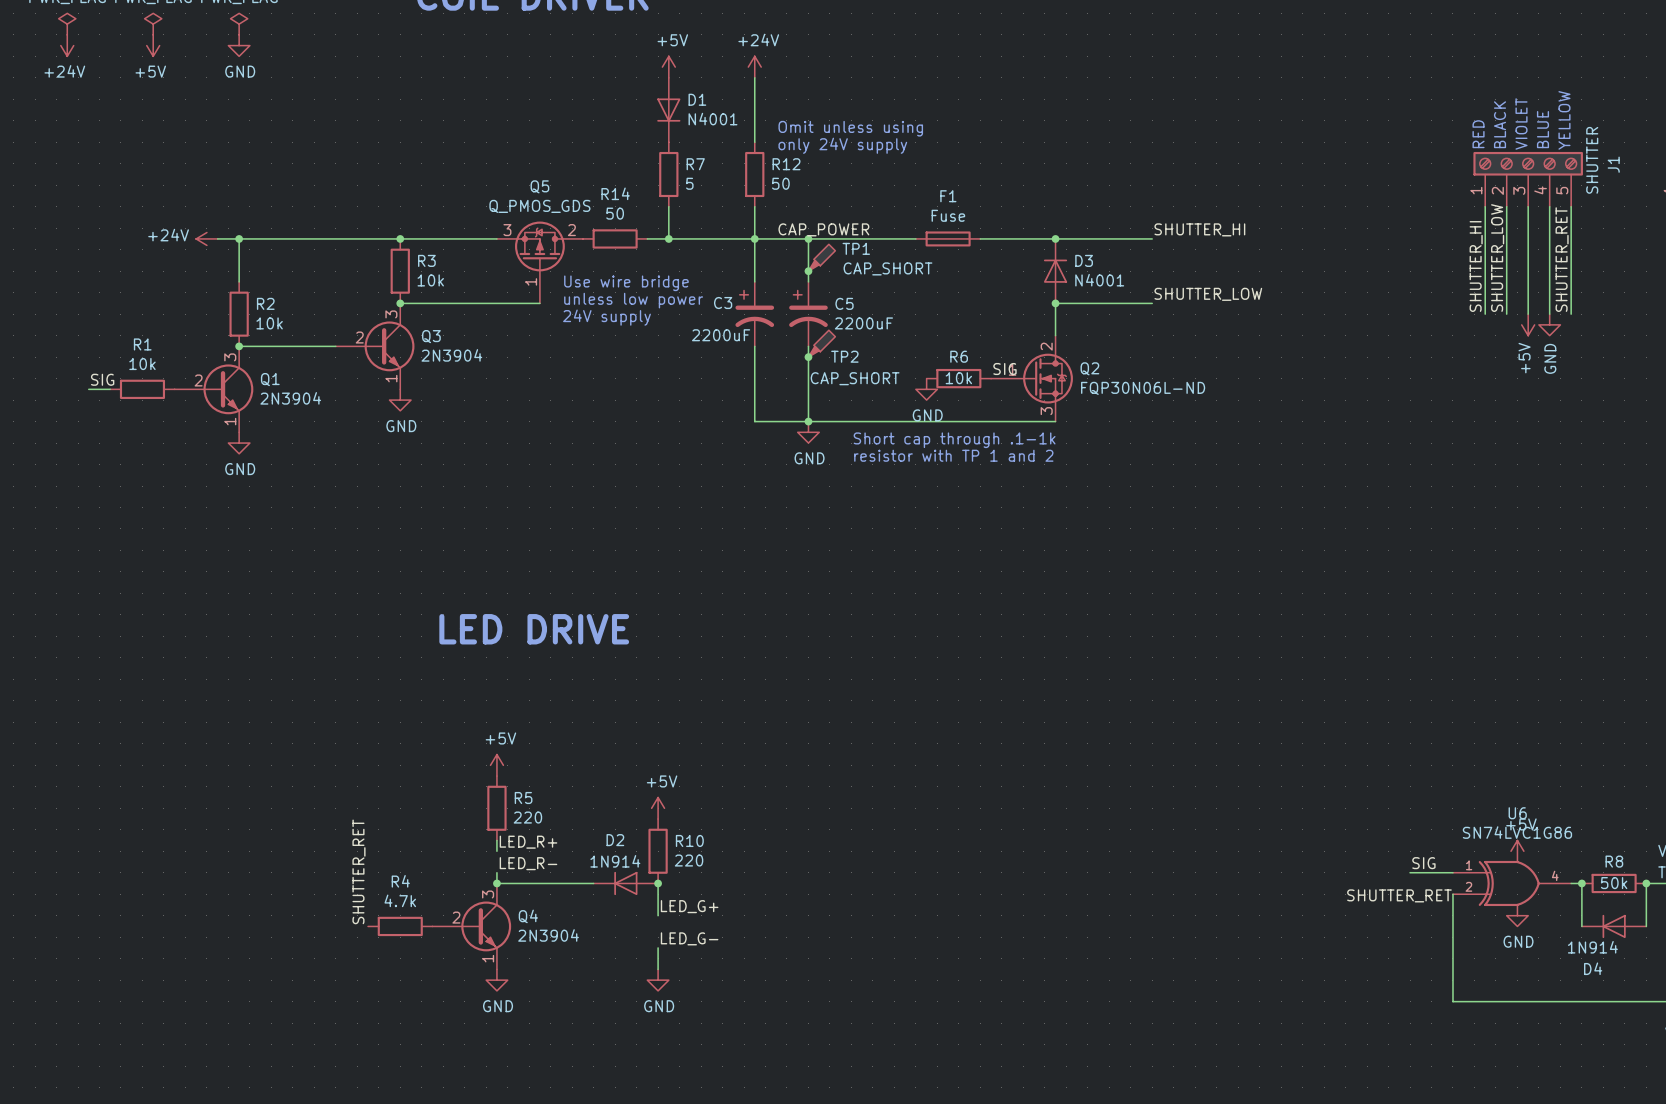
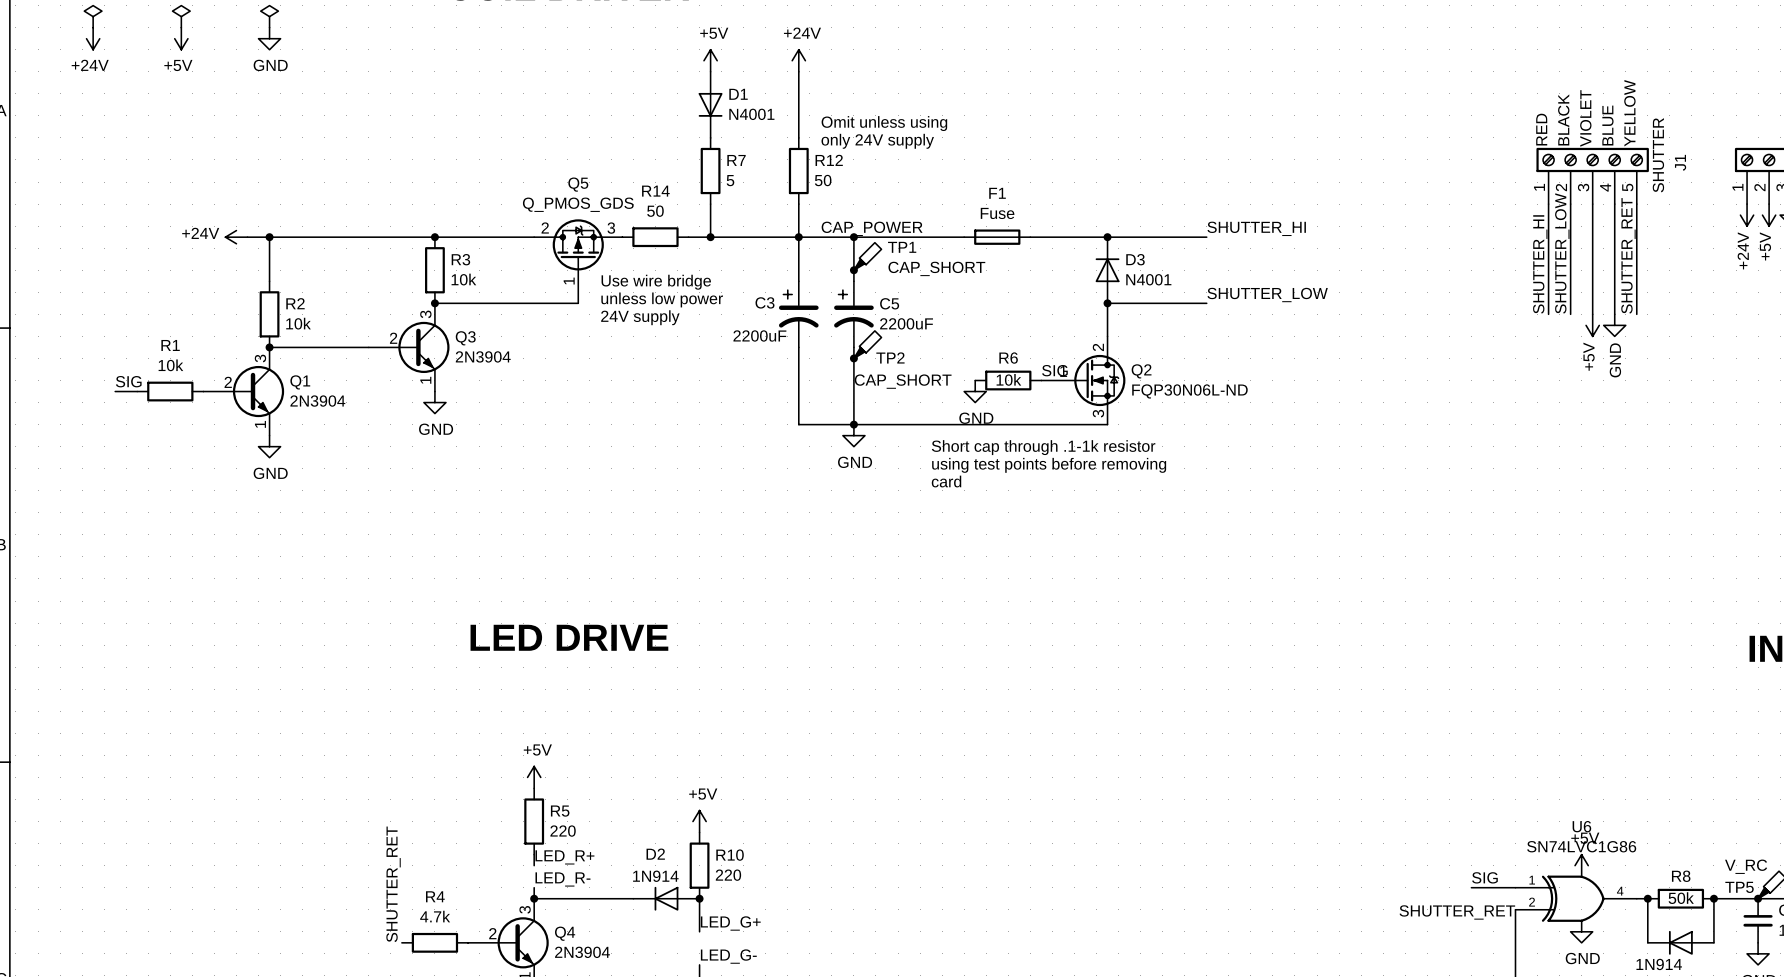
Q5 flip: as is (539, 246) -> left-right (578, 244)
text: Short cap through .1-1k (954, 440) -> Short cap through .1-1k resistor (1043, 447)
text: resistor with TP 1 and 2 (953, 455) -> none
text: none -> using test points before removing (1049, 465)
text: none -> card (946, 481)

